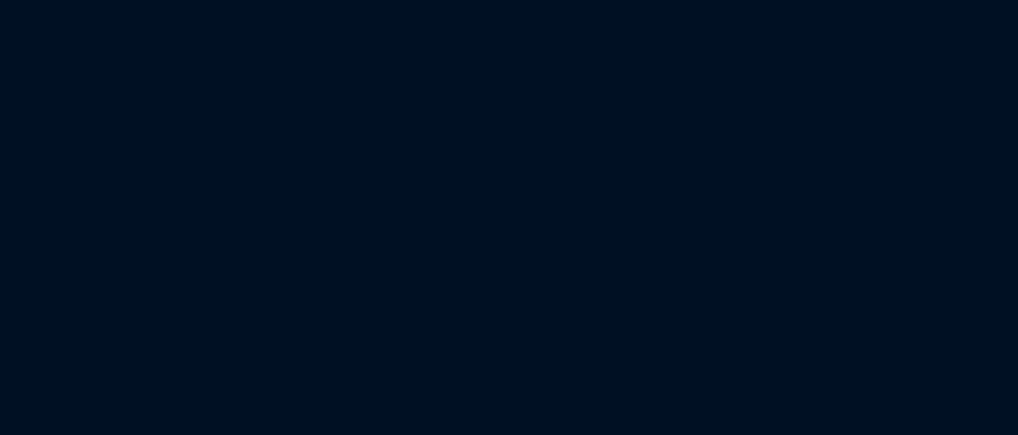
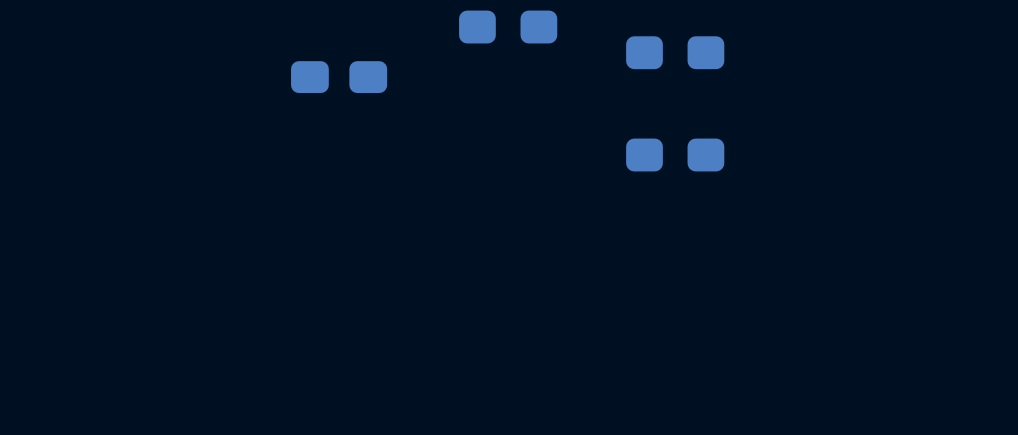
part: none -> (508, 27)
part: none -> (675, 52)
part: none -> (339, 77)
part: none -> (675, 155)

